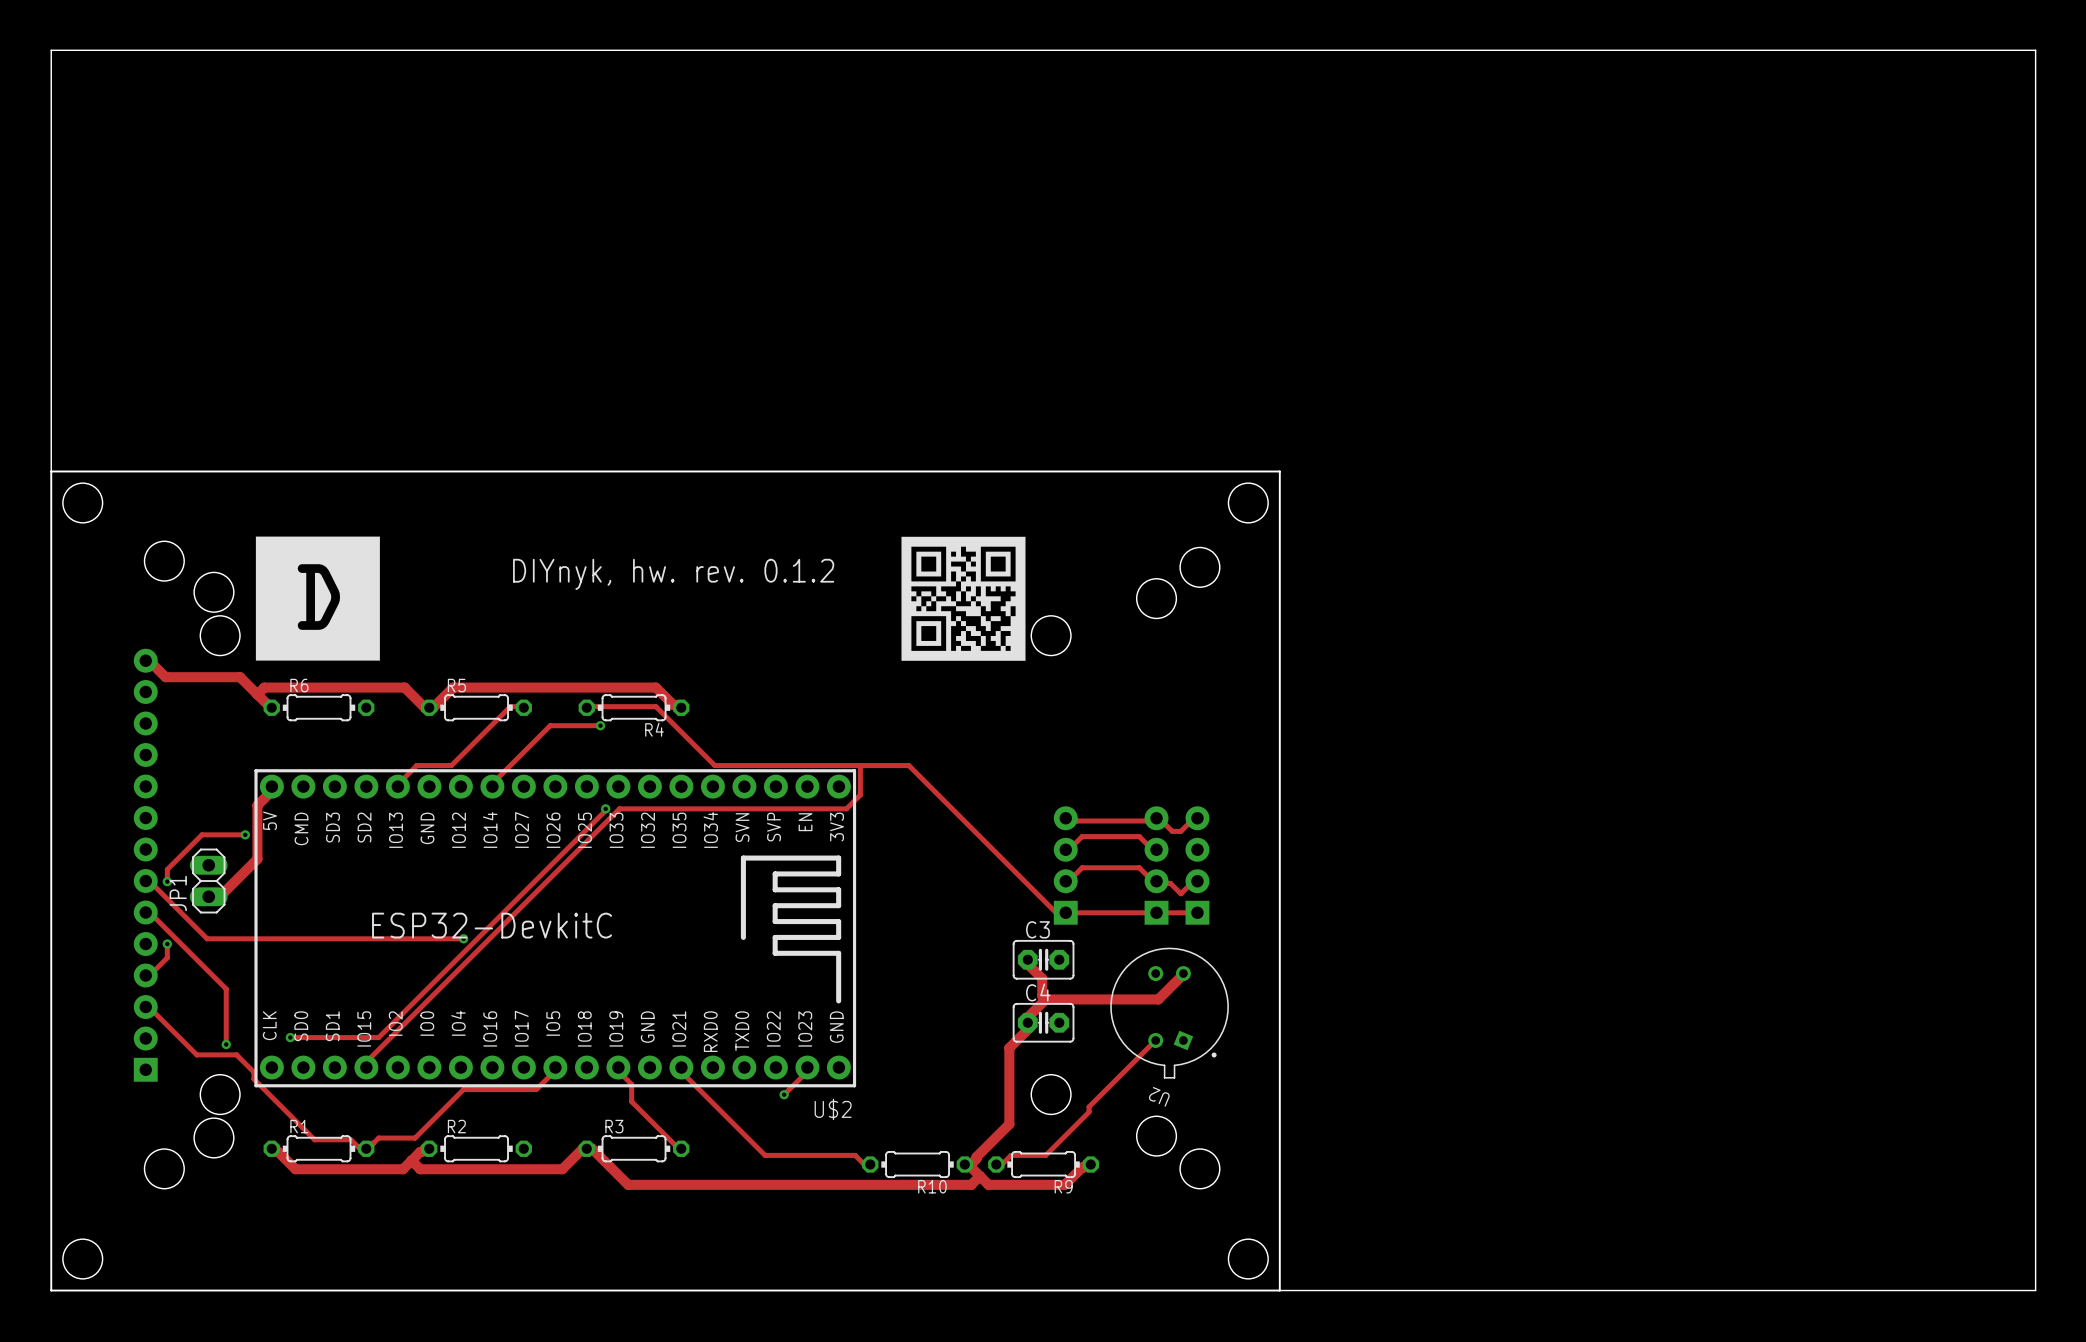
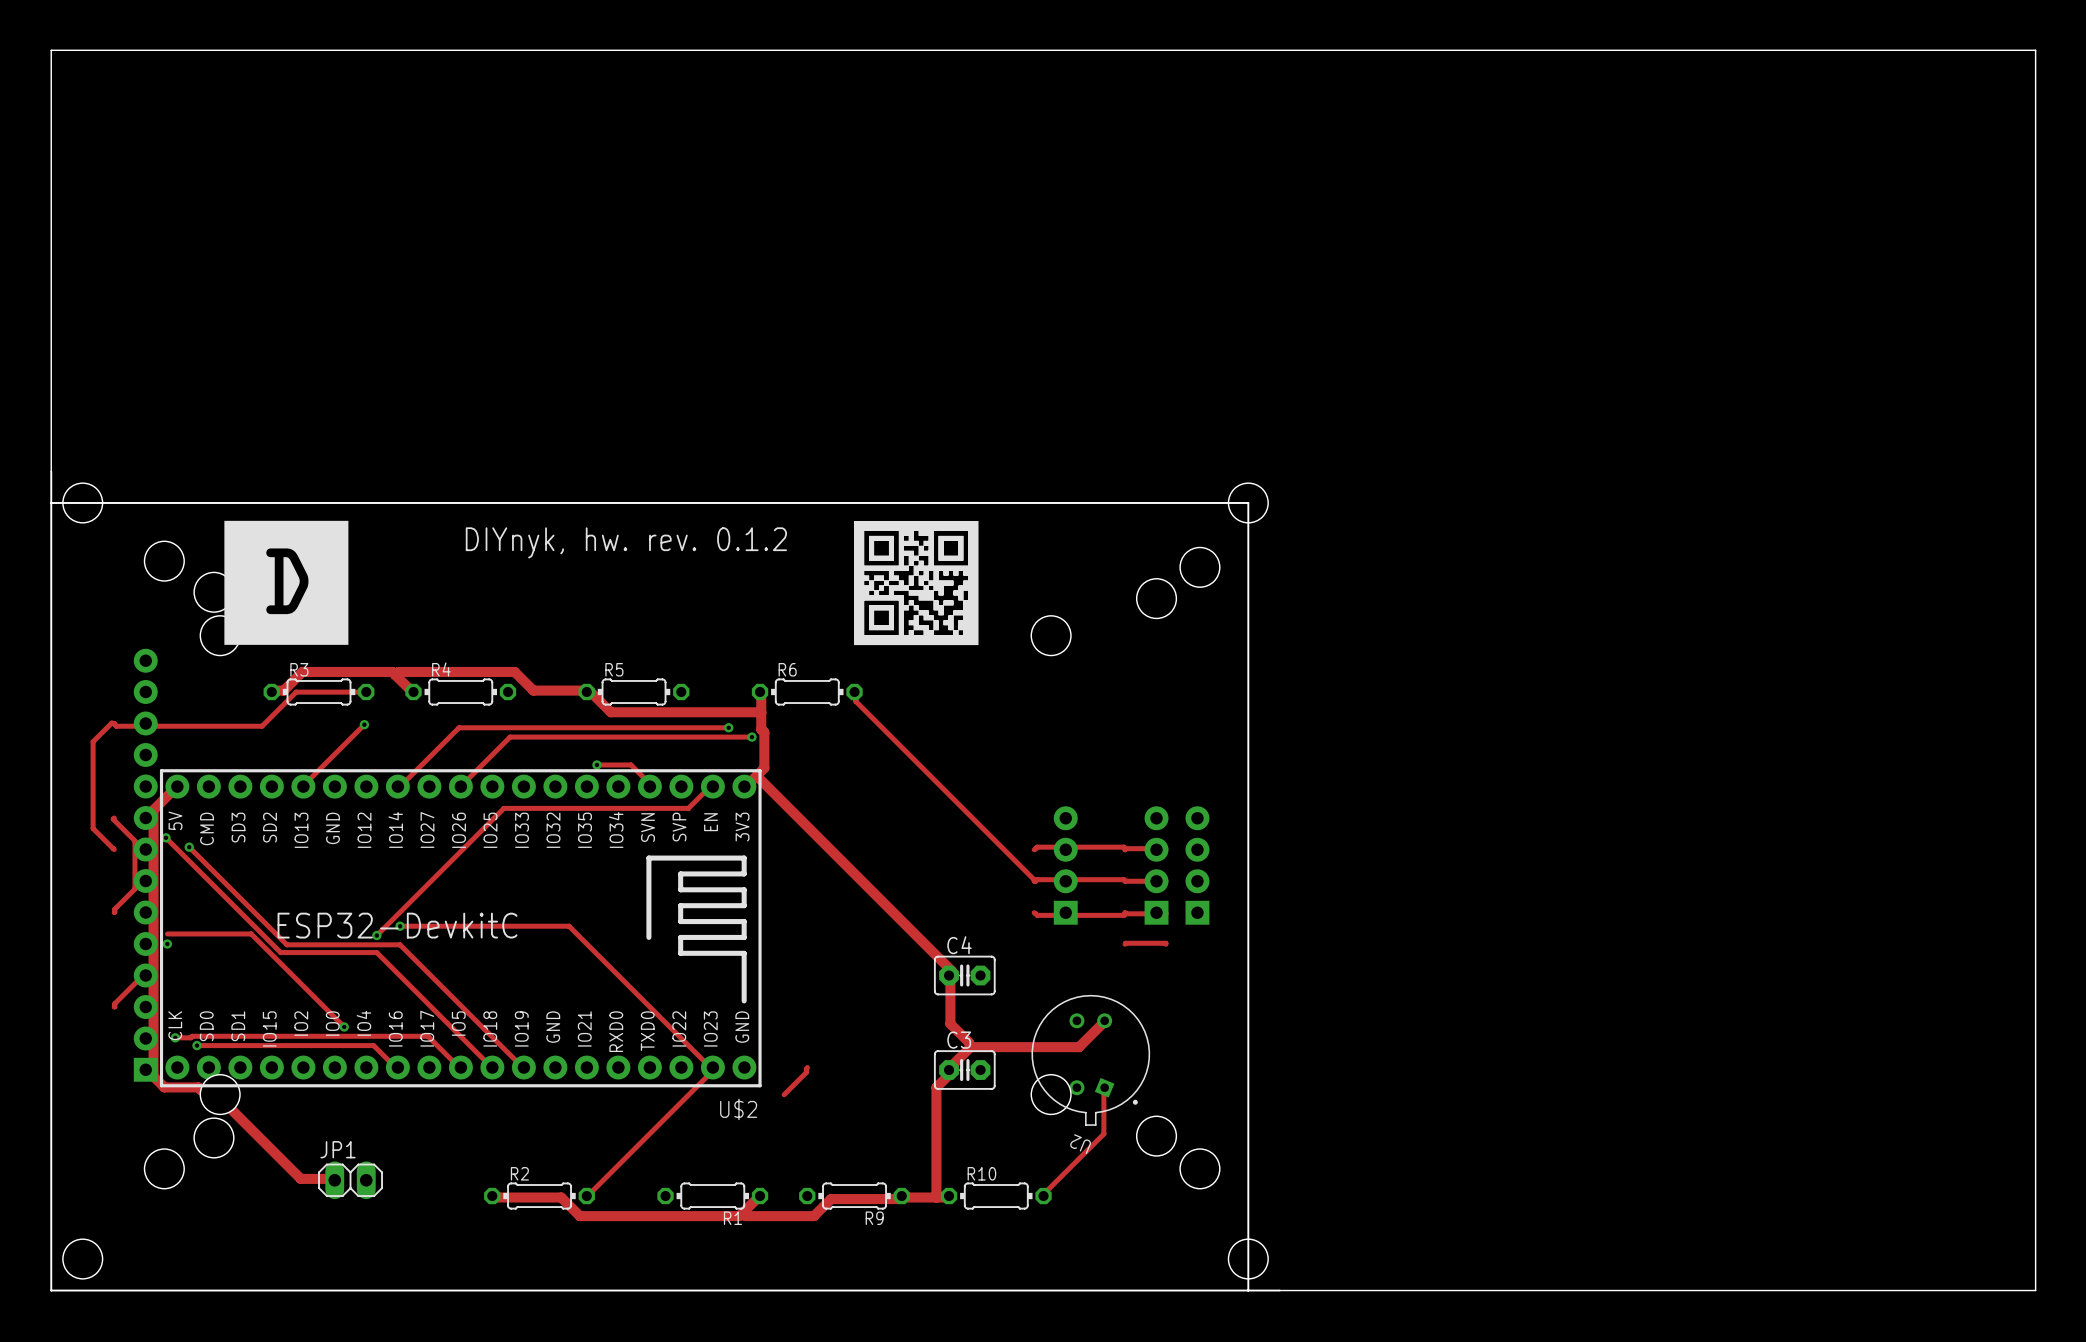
board edge: (51, 471) (1279, 471) (1279, 1290) -> none
board edge: none -> (51, 502) (1248, 502) (1248, 1290)
text position: DIYnyk, hw. rev. 0.1.2 (673, 574) -> DIYnyk, hw. rev. 0.1.2 (626, 542)
drawing position: (317, 598) -> (286, 582)
drawing position: (963, 598) -> (916, 583)
track: (145, 660) (150, 661) (165, 677) (240, 677) (271, 707) -> none
track: none -> (395, 675) (398, 671) (514, 671) (533, 690) (590, 692) (610, 712) (761, 712)
track: none -> (271, 691) (283, 690) (302, 671) (392, 671) (413, 691)
track: none -> (366, 691) (296, 692) (262, 726) (116, 726) (111, 723) (93, 741) (93, 828) (114, 849)
track: none -> (760, 691) (761, 729) (764, 732) (764, 768) (744, 786)
track: none -> (854, 691) (855, 701) (1034, 881) (1037, 879) (1165, 881)
track: (257, 694) (264, 687) (404, 687) (425, 708) (428, 708) (434, 706) (453, 687) (655, 687) (673, 704) (681, 707) -> none
R6 position: (319, 707) -> (807, 691)
R5 position: (476, 707) -> (634, 691)
track: (523, 707) (510, 706) (451, 765) (416, 765) (397, 786) -> (728, 727) (458, 727) (401, 785) (397, 786)
track: (586, 707) (655, 706) (714, 765) (908, 765) (1056, 912) (1156, 912) -> none
R4 position: (634, 707) -> (460, 691)
track: none -> (364, 724) (303, 786)
via: none -> (364, 724)
track: (600, 725) (550, 725) (493, 782) (492, 786) -> none
via: (600, 725) -> none
via: none -> (728, 727)
R4 name position: R4 (654, 729) -> R4 (441, 669)
track: none -> (751, 737) (510, 737) (460, 786)
via: none -> (751, 737)
track: none -> (596, 764) (631, 764) (651, 785) (649, 786)
via: none -> (596, 764)
track: (860, 765) (860, 795) (846, 808) (619, 808) (366, 1061) (366, 1067) -> none
track: none -> (756, 775) (951, 971) (949, 975) (950, 1023) (969, 1042) (970, 1047)
track: none -> (177, 786) (153, 809) (153, 1076) (164, 1087) (198, 1087) (201, 1090) (212, 1090) (300, 1178) (334, 1180)
track: (271, 786) (271, 791) (257, 805) (257, 859) (221, 895) (208, 896) -> none
track: none -> (712, 786) (711, 785) (688, 808) (503, 808) (376, 935)
track: (605, 808) (378, 1037) (290, 1037) -> none
via: (605, 808) -> none
track: none -> (114, 818) (113, 819) (134, 840) (134, 889) (114, 909) (114, 912)
track: (1065, 818) (1076, 820) (1154, 820) (1156, 818) (1160, 819) (1172, 831) (1180, 831) (1193, 819) (1197, 818) -> none
track: (245, 834) (201, 834) (167, 869) (167, 881) -> none
via: (245, 834) -> none
track: none -> (165, 837) (280, 952) (376, 952) (492, 1067)
via: none -> (165, 837)
track: none -> (189, 847) (286, 944) (400, 944) (523, 1067)
via: none -> (189, 847)
track: (1151, 848) (1139, 836) (1082, 836) (1070, 848) (1065, 849) -> (1151, 848) (1037, 847) (1034, 849)
track: (145, 881) (150, 881) (207, 938) (463, 938) -> none
via: (167, 881) -> none
JP1 rotation: 0° (208, 881) -> 90° clockwise (350, 1180)
JP1 position: (208, 881) -> (350, 1180)
track: (1065, 881) (1070, 879) (1082, 867) (1139, 867) (1151, 879) (1156, 881) (1156, 883) (1170, 883) (1180, 893) (1193, 881) (1197, 881) -> none
track: (145, 912) (150, 912) (226, 989) (226, 1044) -> none
track: none -> (1034, 912) (1037, 915) (1124, 915) (1125, 912) (1165, 912)
track: (1197, 912) (1156, 912) -> none
track: none -> (400, 926) (569, 926) (710, 1067) (712, 1067) (711, 1071) (586, 1196)
via: none -> (400, 926)
U$2 position: (555, 928) -> (460, 928)
track: none -> (167, 933) (251, 933) (344, 1026)
via: none -> (376, 935)
via: (463, 938) -> none
track: (167, 944) (167, 957) (150, 975) (145, 975) -> none
track: none -> (1125, 944) (1165, 944)
track: (1027, 959) (1028, 964) (1042, 978) (1042, 995) (1045, 999) -> none
C3 position: (1043, 959) -> (964, 1070)
track: (1183, 973) (1158, 999) (1045, 999) -> none
track: none -> (141, 975) (114, 1003) (114, 1007)
track: (1045, 999) (1028, 1016) (1027, 1022) (1030, 1027) (1009, 1047) (1009, 1124) (969, 1165) -> none
track: (145, 1007) (150, 1008) (196, 1054) (236, 1054) (253, 1072) (253, 1079) (314, 1139) (350, 1139) (359, 1148) (366, 1148) (378, 1138) (415, 1138) (463, 1089) (536, 1089) (553, 1072) (555, 1067) -> none
U2 position: (1169, 1013) -> (1090, 1060)
track: none -> (1104, 1020) (1079, 1047) (970, 1047)
C4 position: (1043, 1022) -> (964, 975)
via: none -> (344, 1026)
track: none -> (175, 1037) (427, 1036) (460, 1067)
via: none -> (175, 1037)
via: (290, 1037) -> none
track: (1155, 1040) (1089, 1106) (1089, 1112) (1045, 1155) (1011, 1155) (1002, 1164) (996, 1164) -> none
via: (226, 1044) -> none
track: none -> (196, 1045) (373, 1045) (396, 1068) (397, 1067)
via: none -> (196, 1045)
track: none -> (970, 1047) (948, 1068) (948, 1075) (936, 1087) (936, 1197)
track: (618, 1067) (619, 1072) (631, 1084) (631, 1101) (678, 1148) (681, 1148) -> none
track: (681, 1067) (681, 1072) (765, 1155) (855, 1155) (863, 1164) (870, 1164) -> none
track: none -> (1104, 1087) (1103, 1133) (1043, 1196)
via: (784, 1094) -> none
R1 name position: R1 (299, 1126) -> R1 (732, 1218)
track: (271, 1148) (276, 1150) (295, 1169) (402, 1169) (420, 1151) (425, 1148) (429, 1148) -> none
R1 position: (319, 1148) -> (712, 1196)
R2 position: (476, 1148) -> (539, 1196)
R3 position: (634, 1148) -> (319, 691)
track: (411, 1160) (420, 1169) (562, 1169) (583, 1148) (591, 1148) (628, 1184) (971, 1184) (979, 1176) -> none
R10 position: (917, 1164) -> (996, 1196)
R9 position: (1043, 1164) -> (854, 1196)
track: (1090, 1164) (1087, 1164) (1082, 1167) (1064, 1184) (988, 1184) (969, 1165) -> none
R10 name position: R10 (932, 1186) -> R10 (981, 1173)
track: none -> (492, 1196) (561, 1197) (579, 1216) (739, 1216) (760, 1196)
track: none -> (949, 1196) (901, 1196) (897, 1199) (831, 1199) (813, 1216) (745, 1216) (742, 1213)

